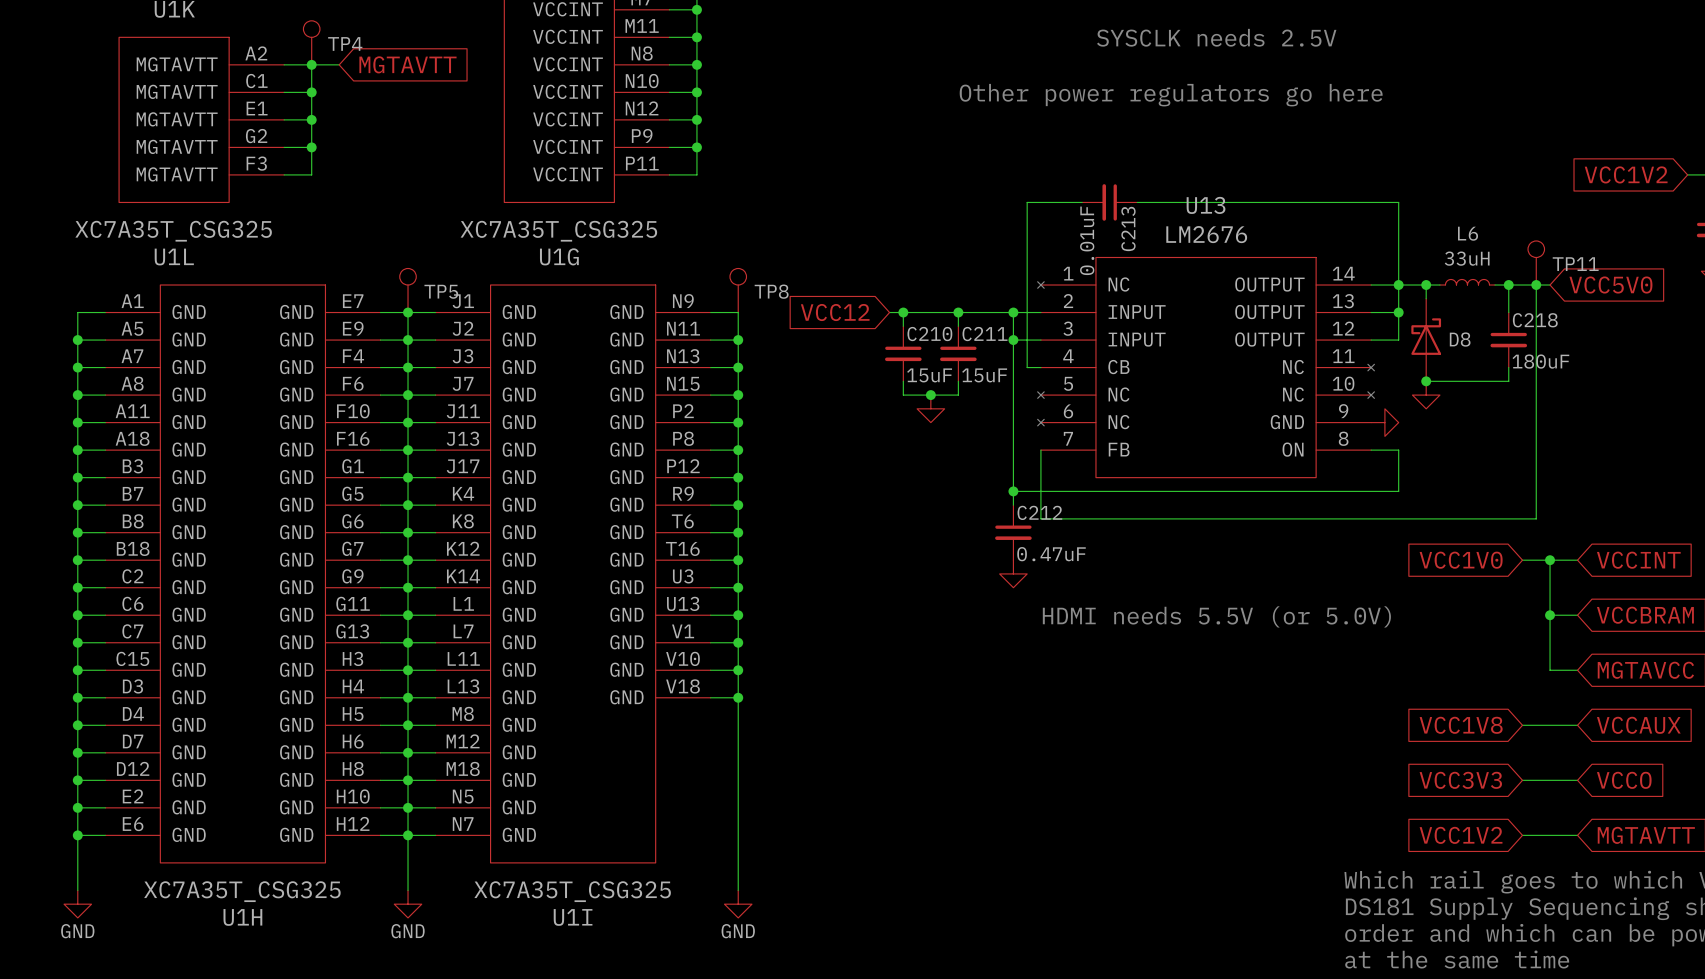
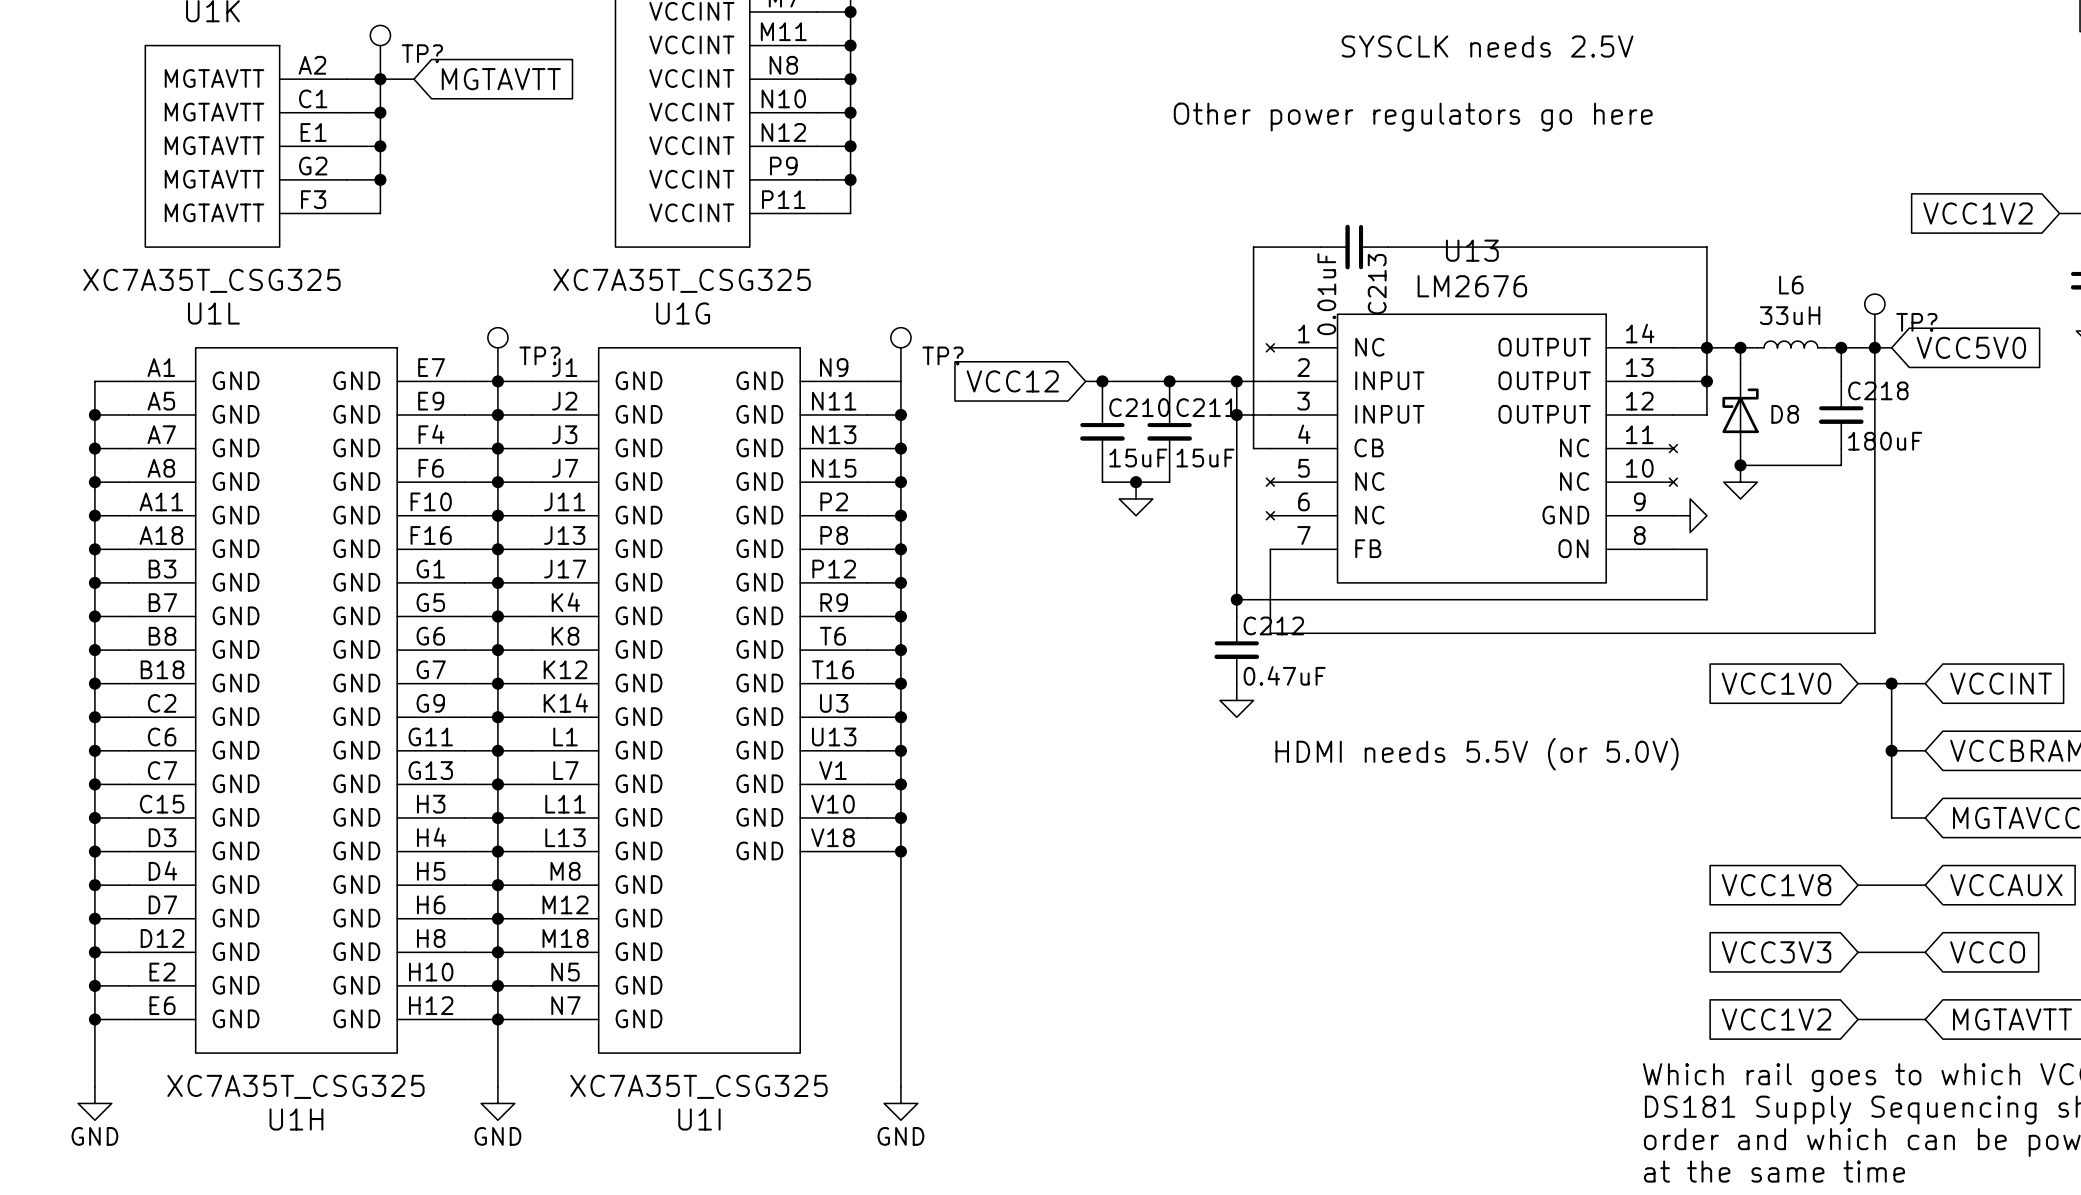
TP4 name: TP4 (345, 43) -> TP? (422, 53)
TP11 name: TP11 (1575, 264) -> TP? (1916, 322)
TP5 name: TP5 (441, 291) -> TP? (539, 355)
TP8 name: TP8 (771, 291) -> TP? (942, 355)

